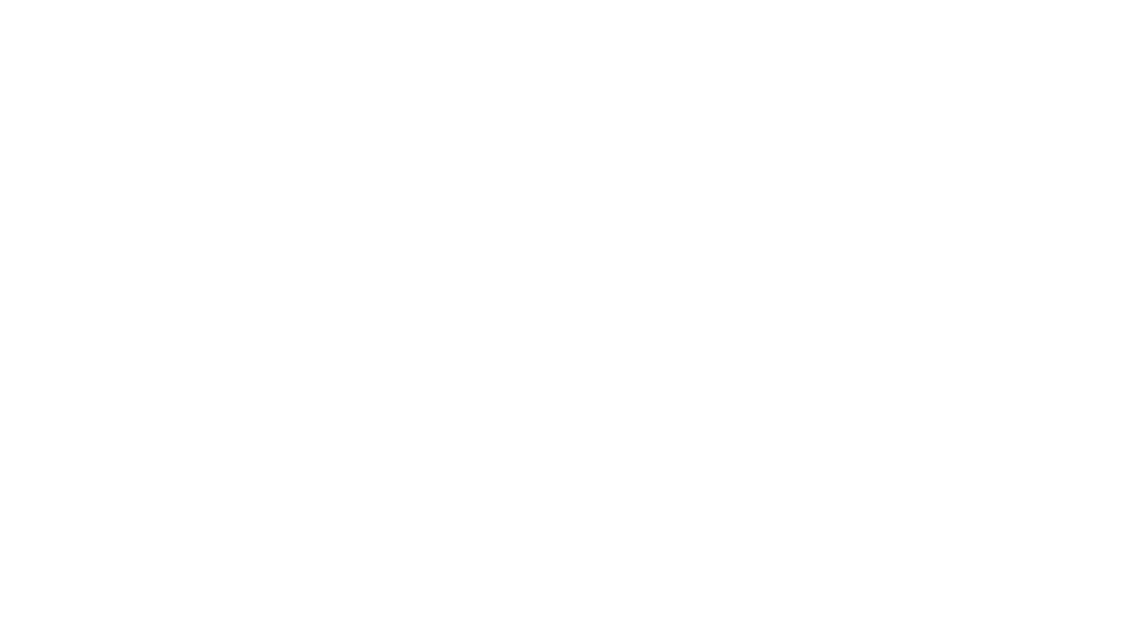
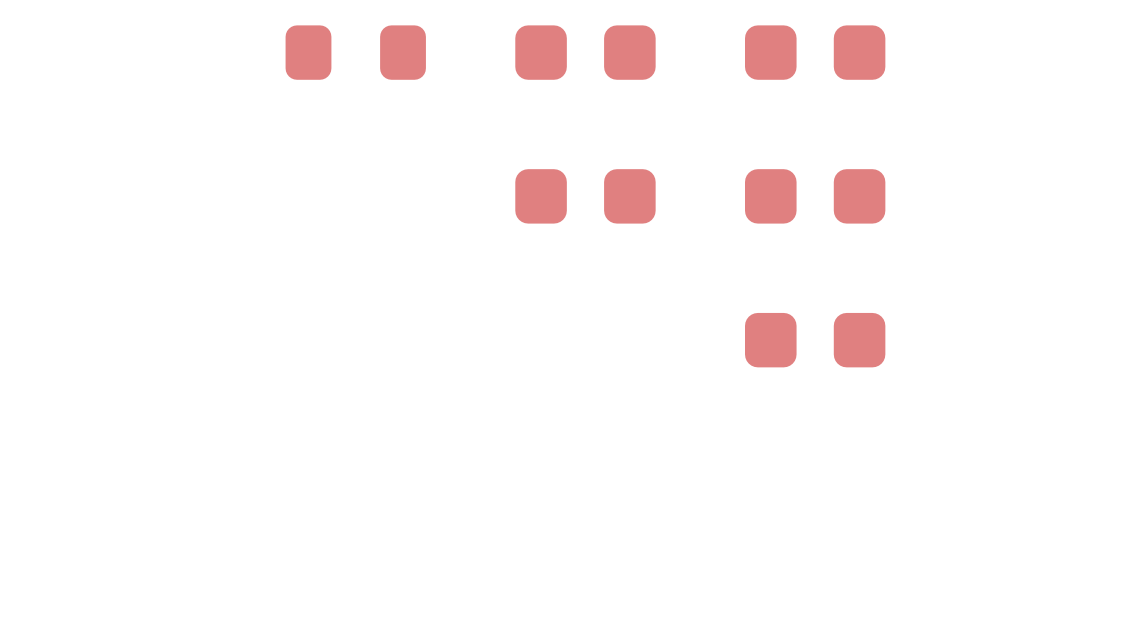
part: none -> (355, 52)
part: none -> (585, 52)
part: none -> (815, 52)
part: none -> (585, 196)
part: none -> (815, 196)
part: none -> (815, 340)

